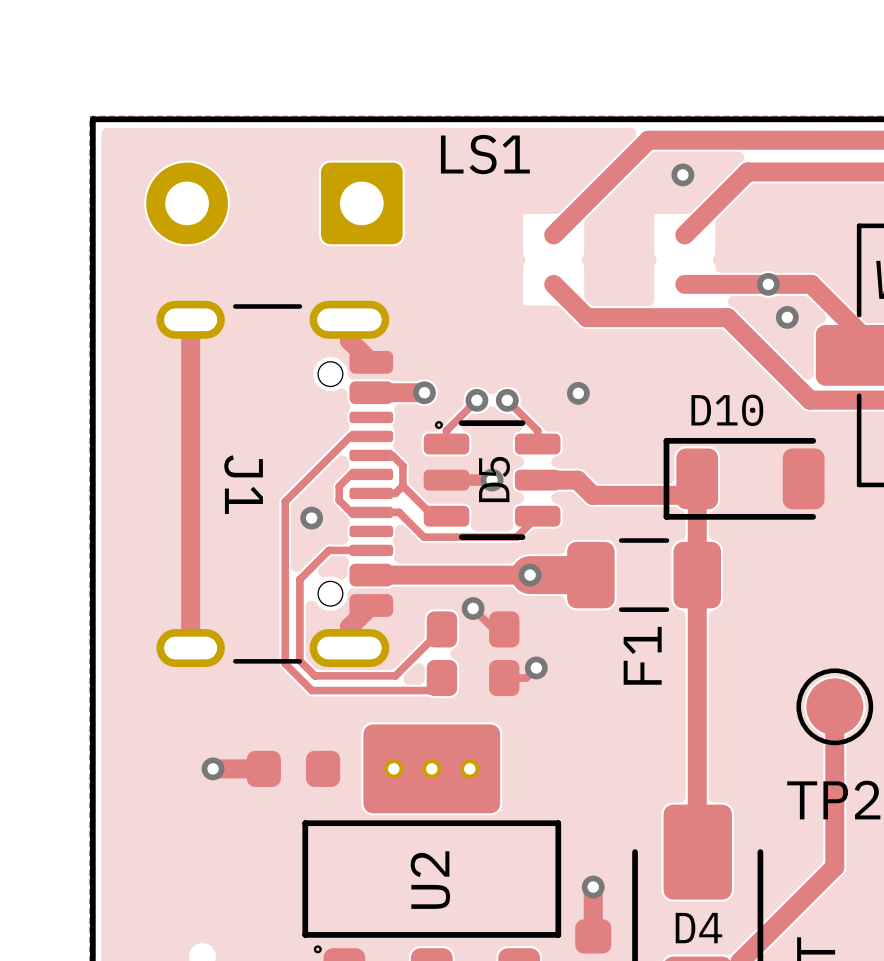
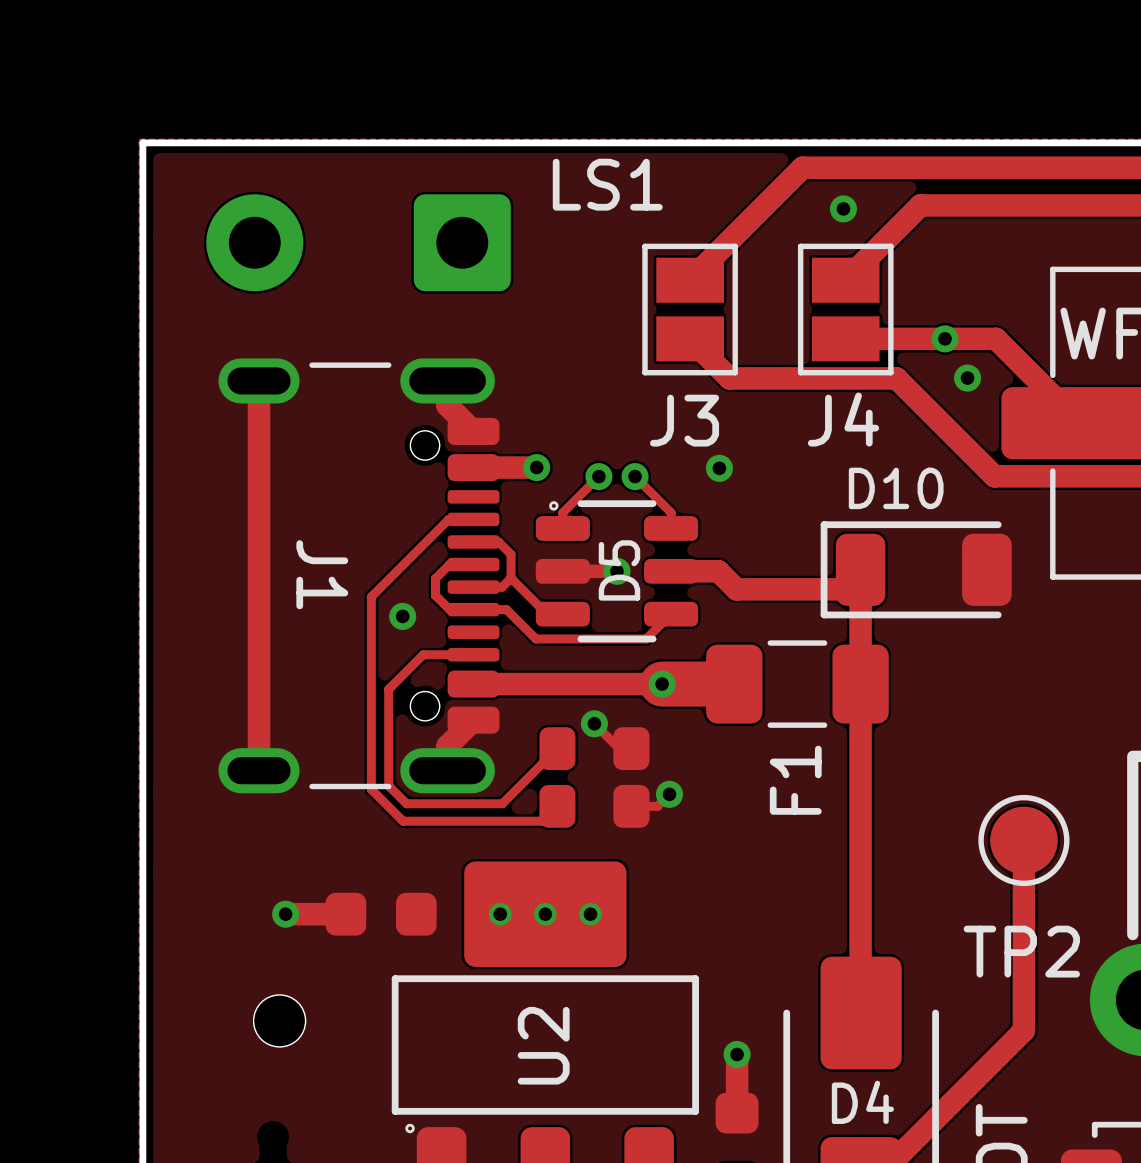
J3: none -> (690, 309)
J4: none -> (845, 309)
part: none -> (279, 1020)

